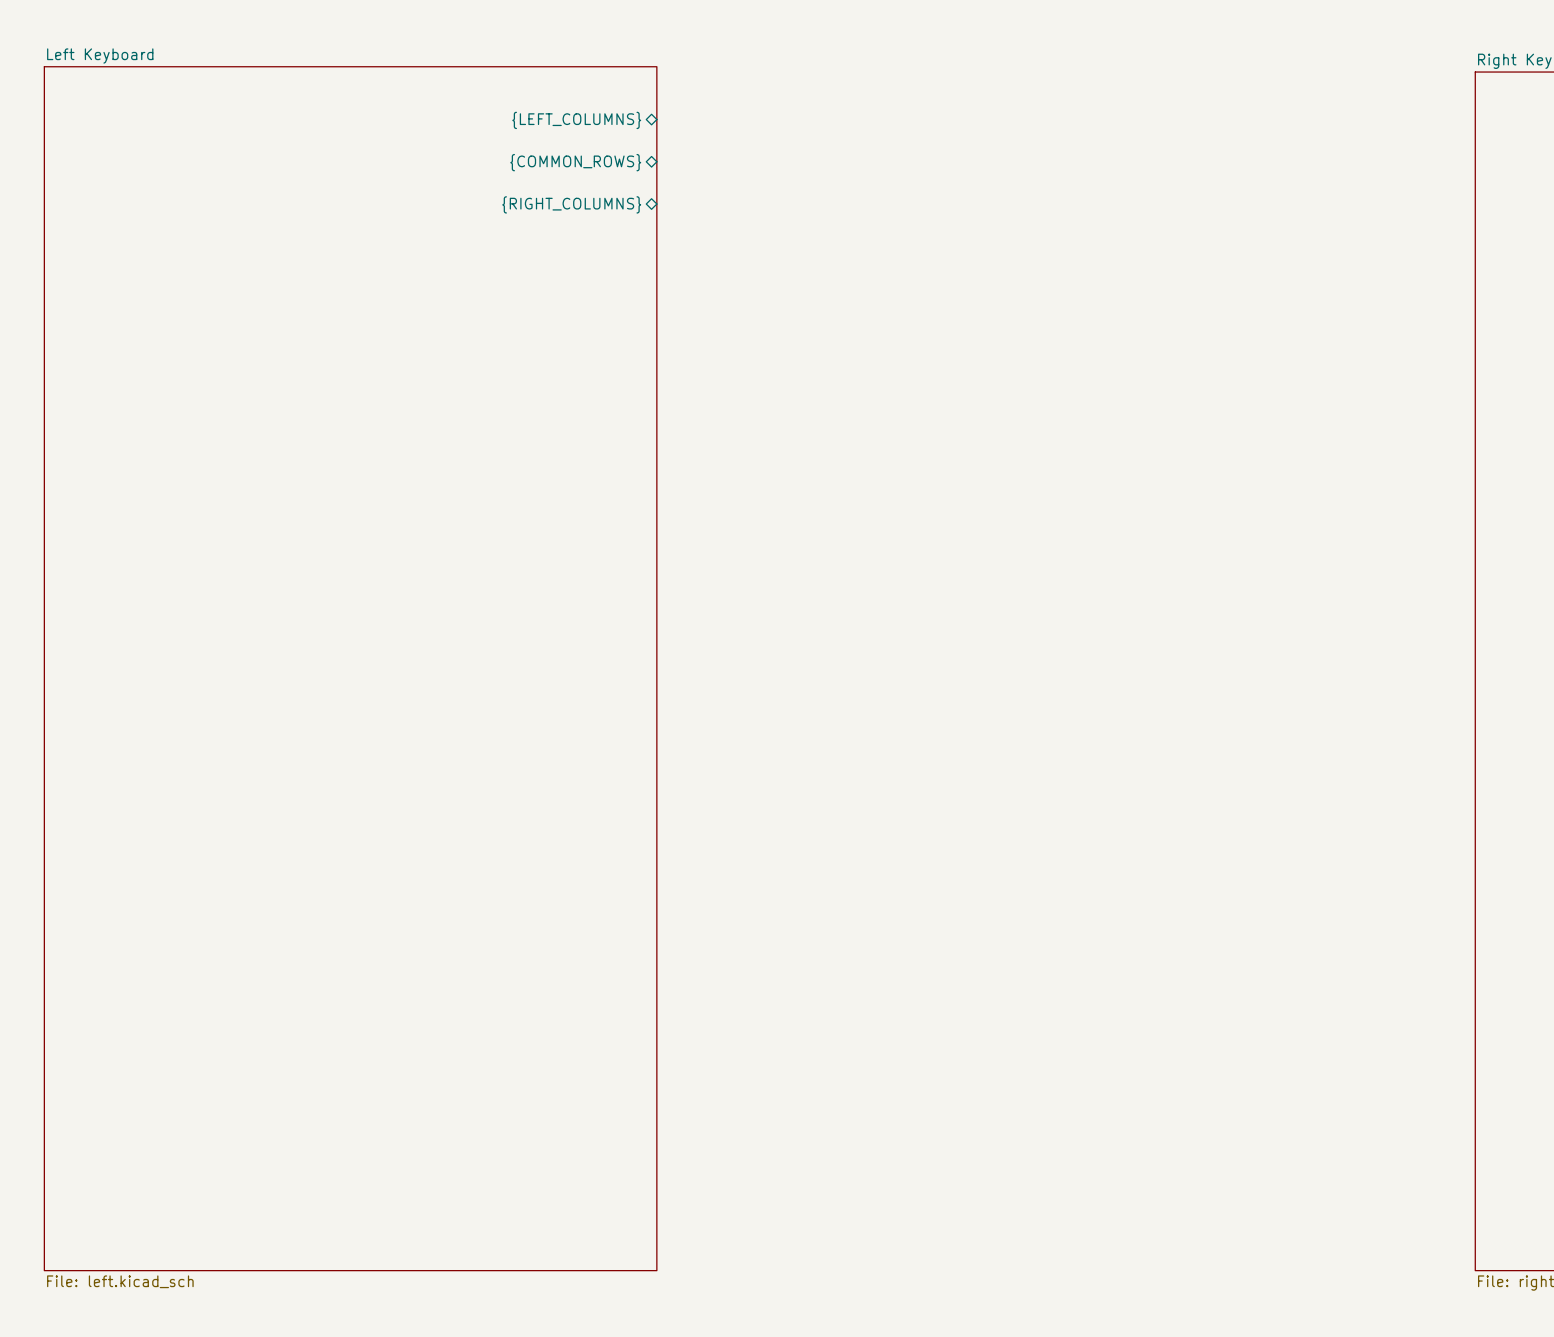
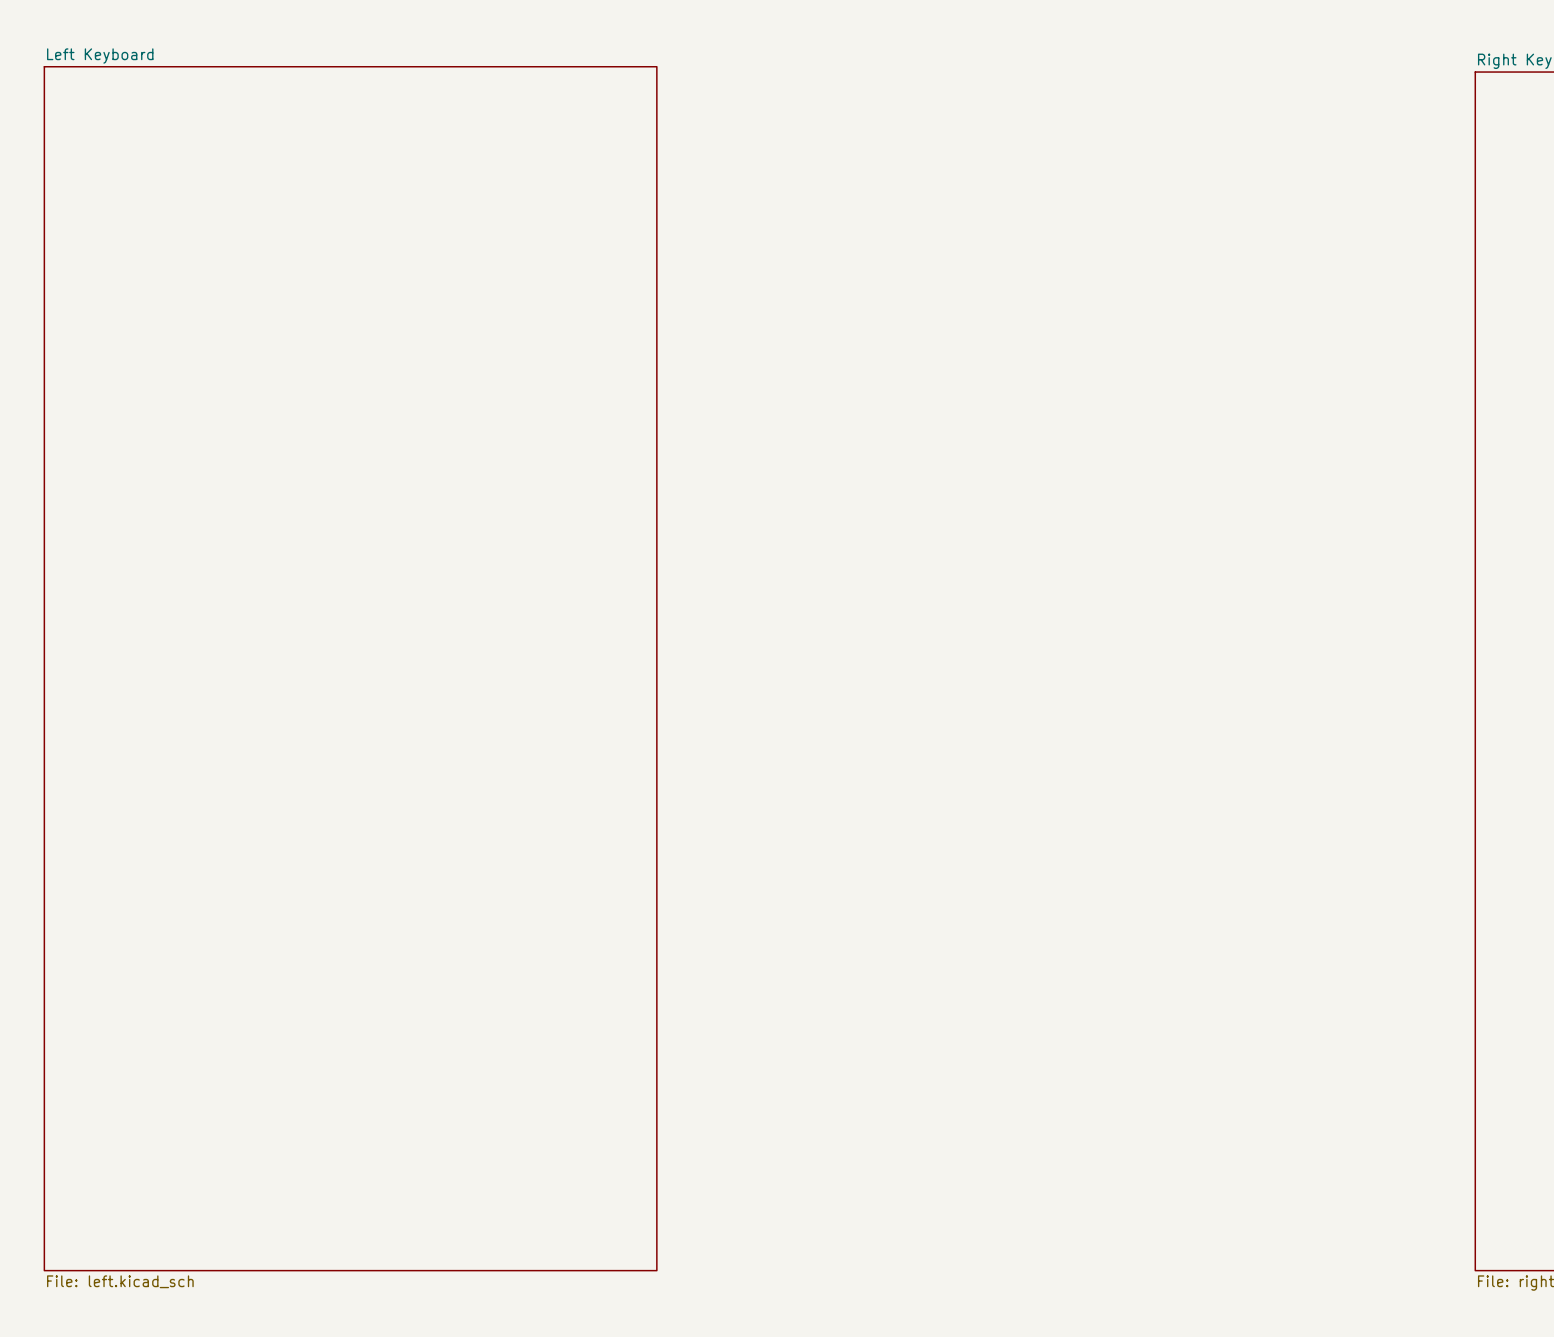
sheet pin: {LEFT_COLUMNS} (576, 120) -> none
sheet pin: {COMMON_ROWS} (575, 162) -> none
sheet pin: {RIGHT_COLUMNS} (571, 204) -> none

